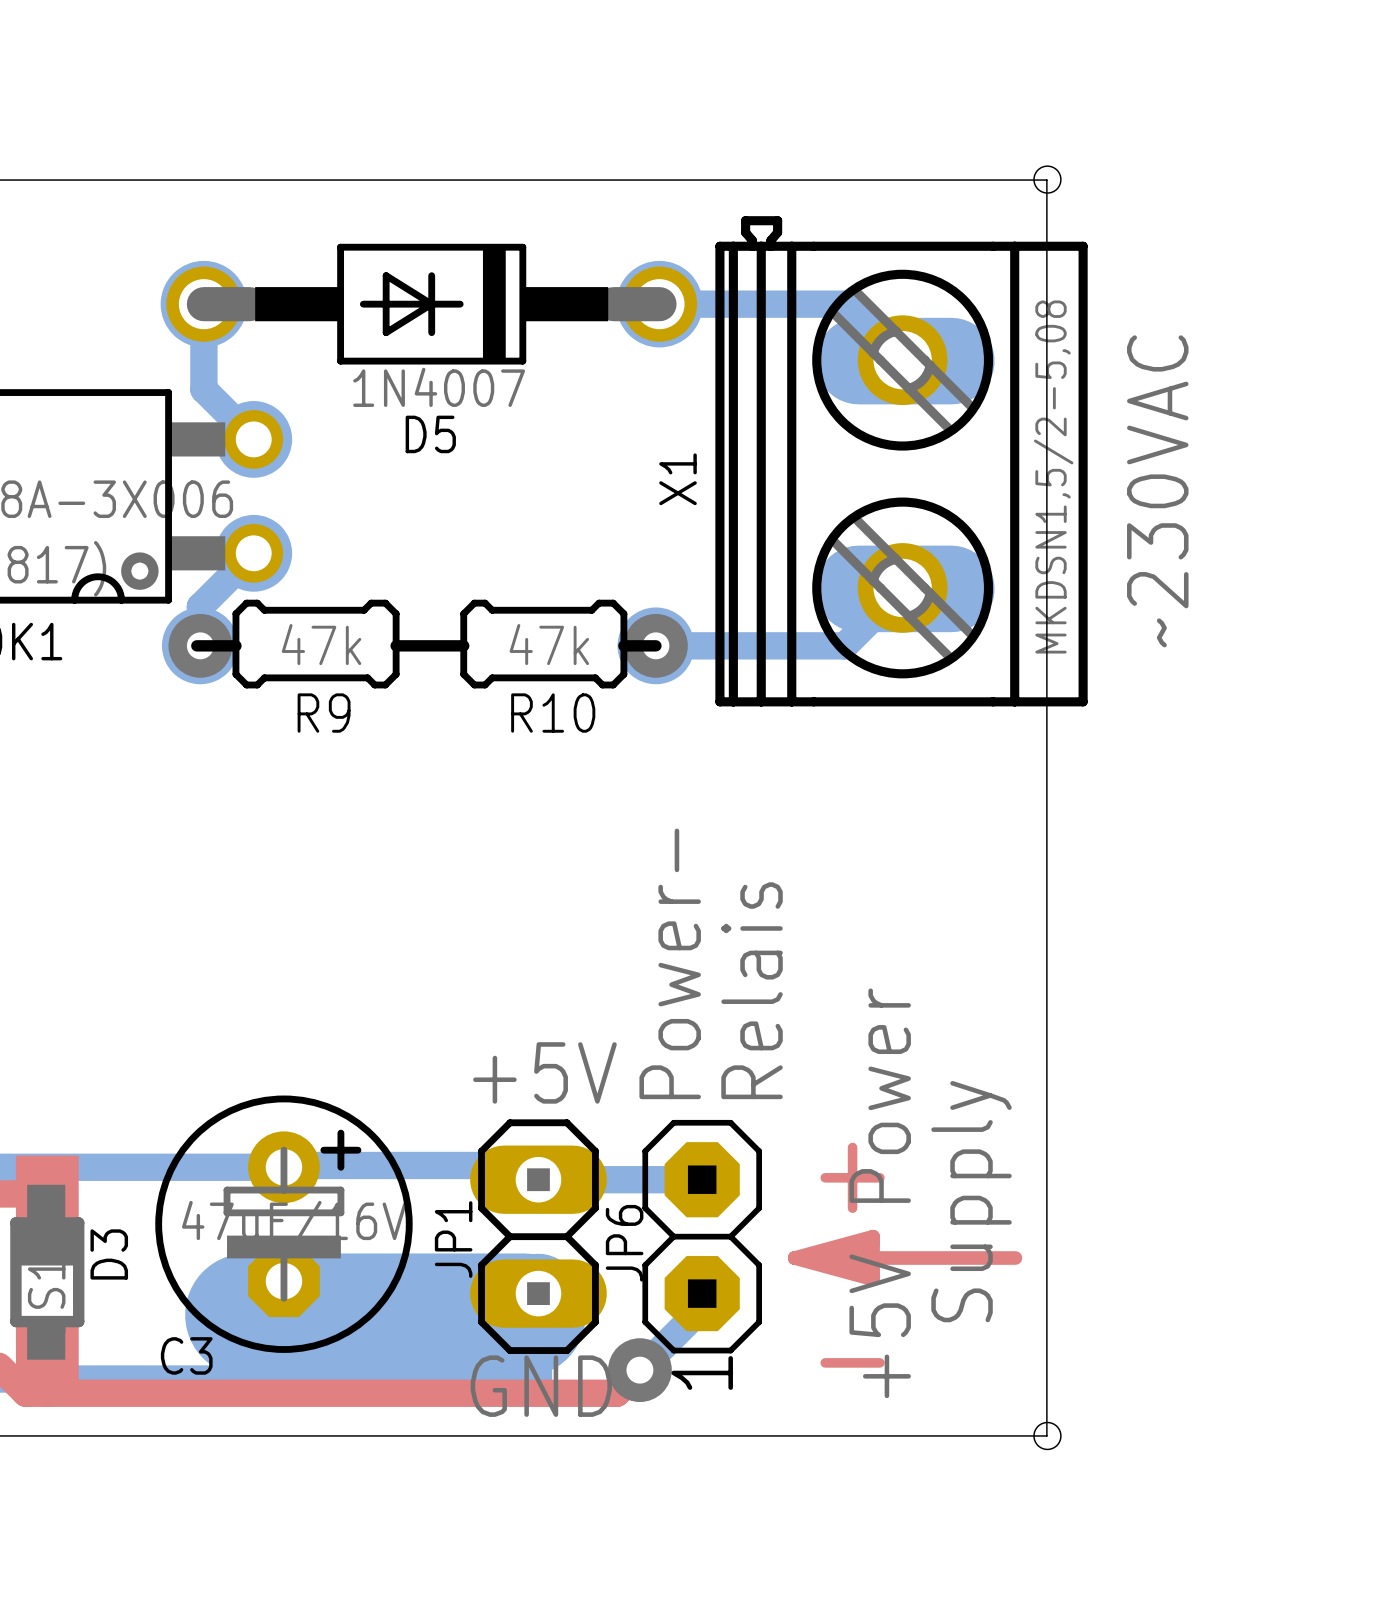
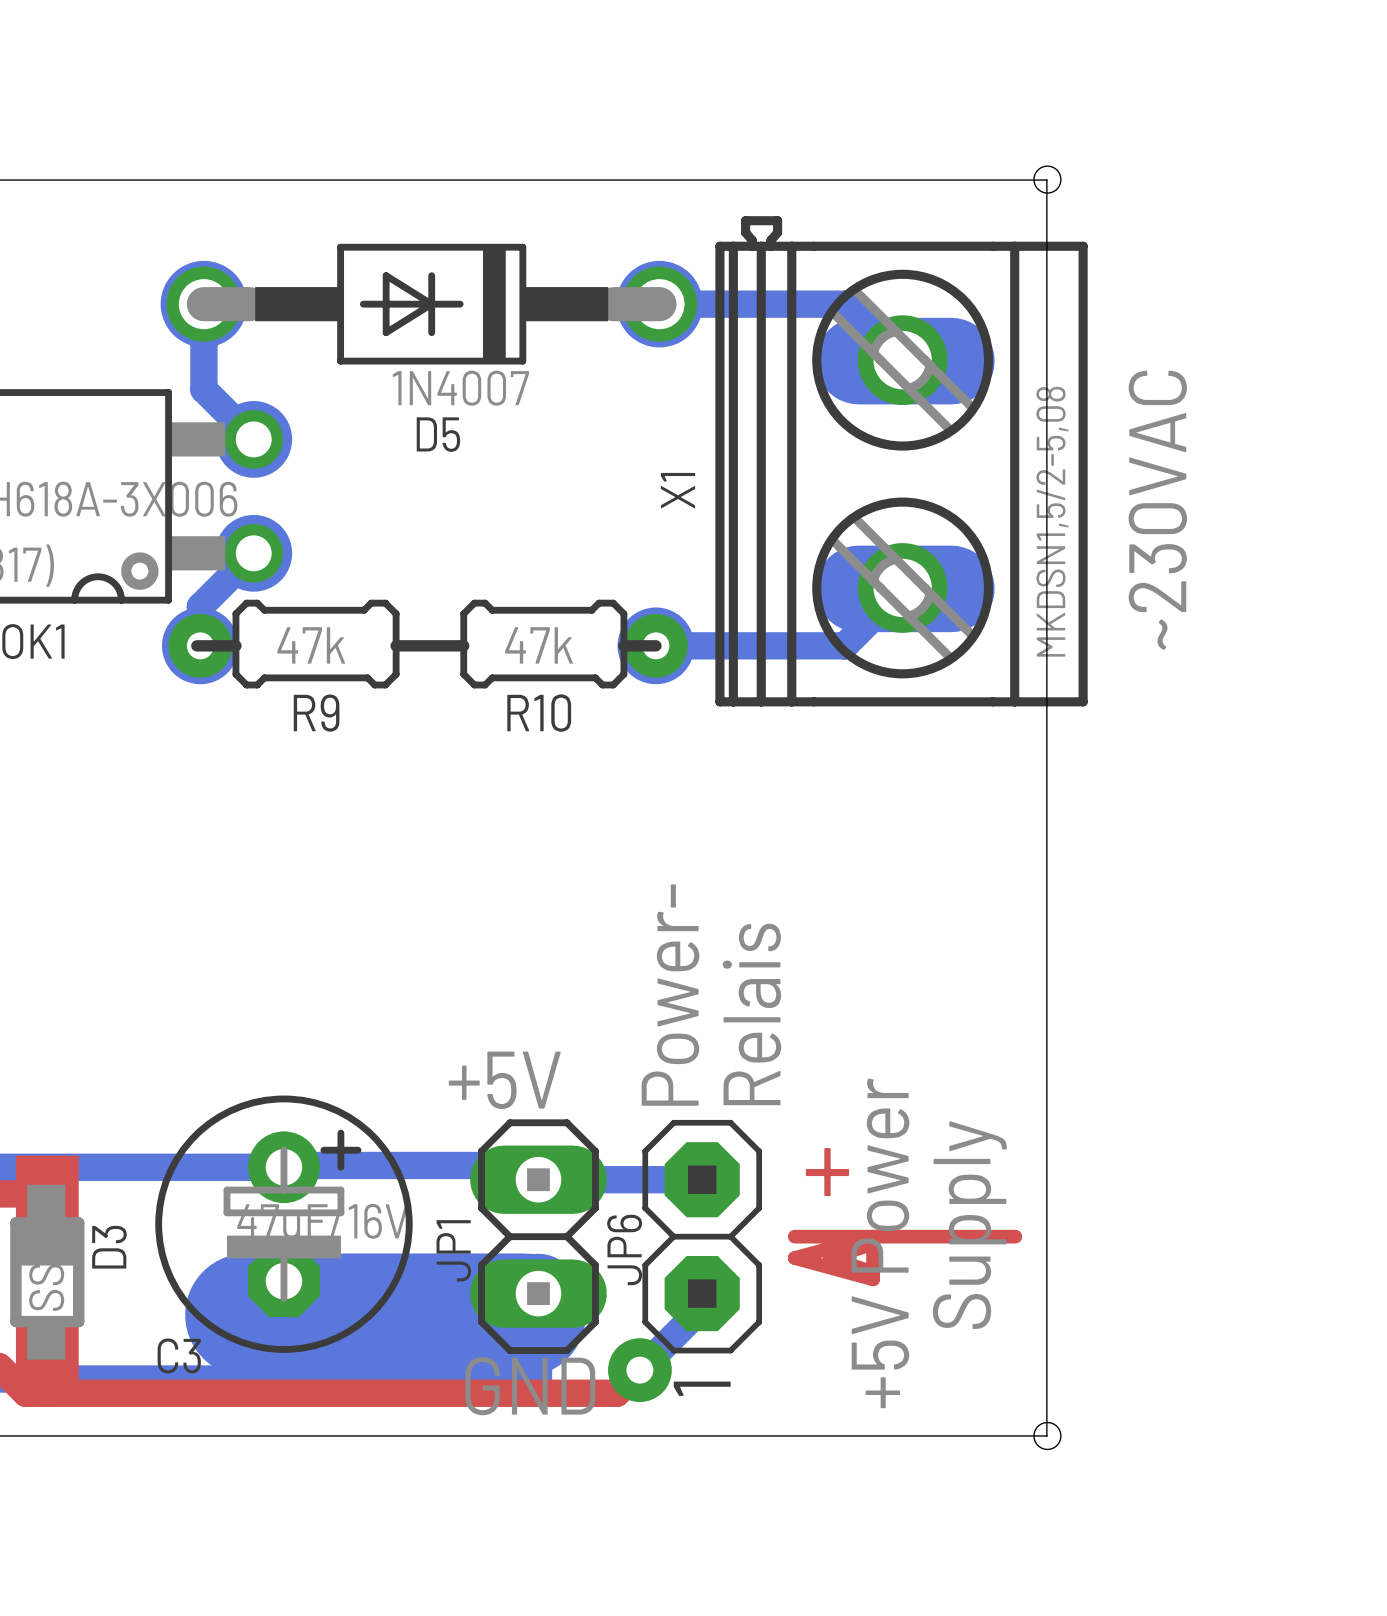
text position: +5V (544, 1072) -> +5V (504, 1080)
top track: (794, 1258) (1015, 1258) -> (794, 1236) (1015, 1236)
text: - (852, 1362) -> none

